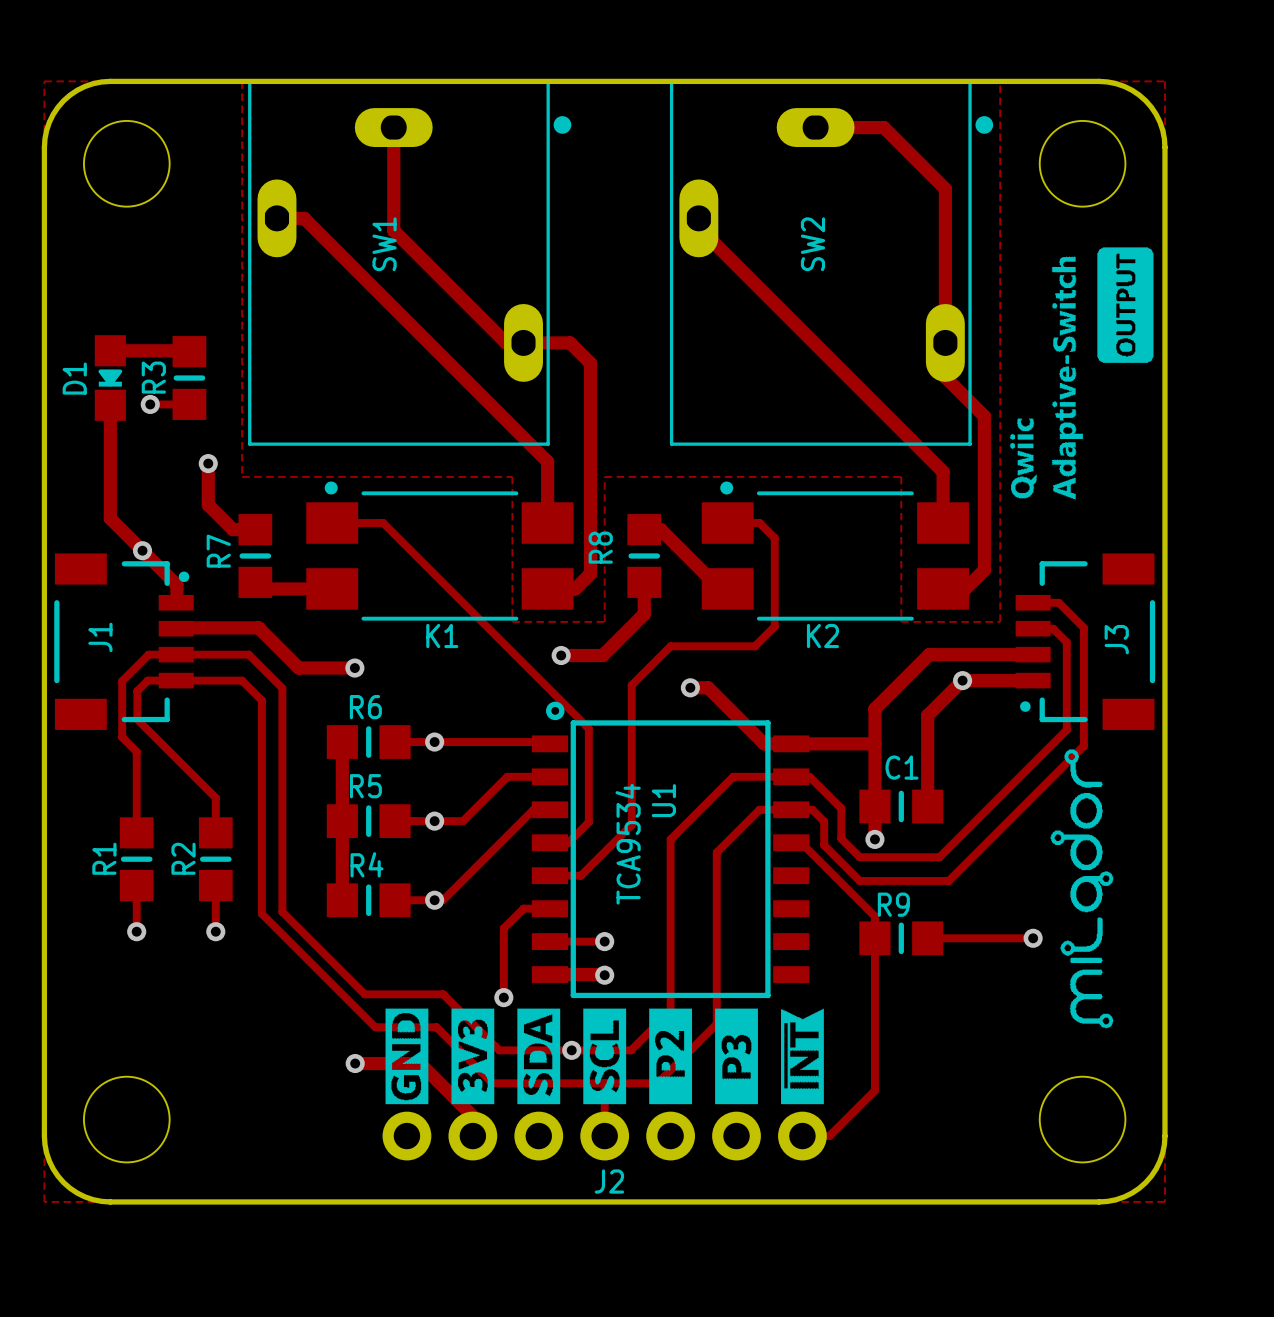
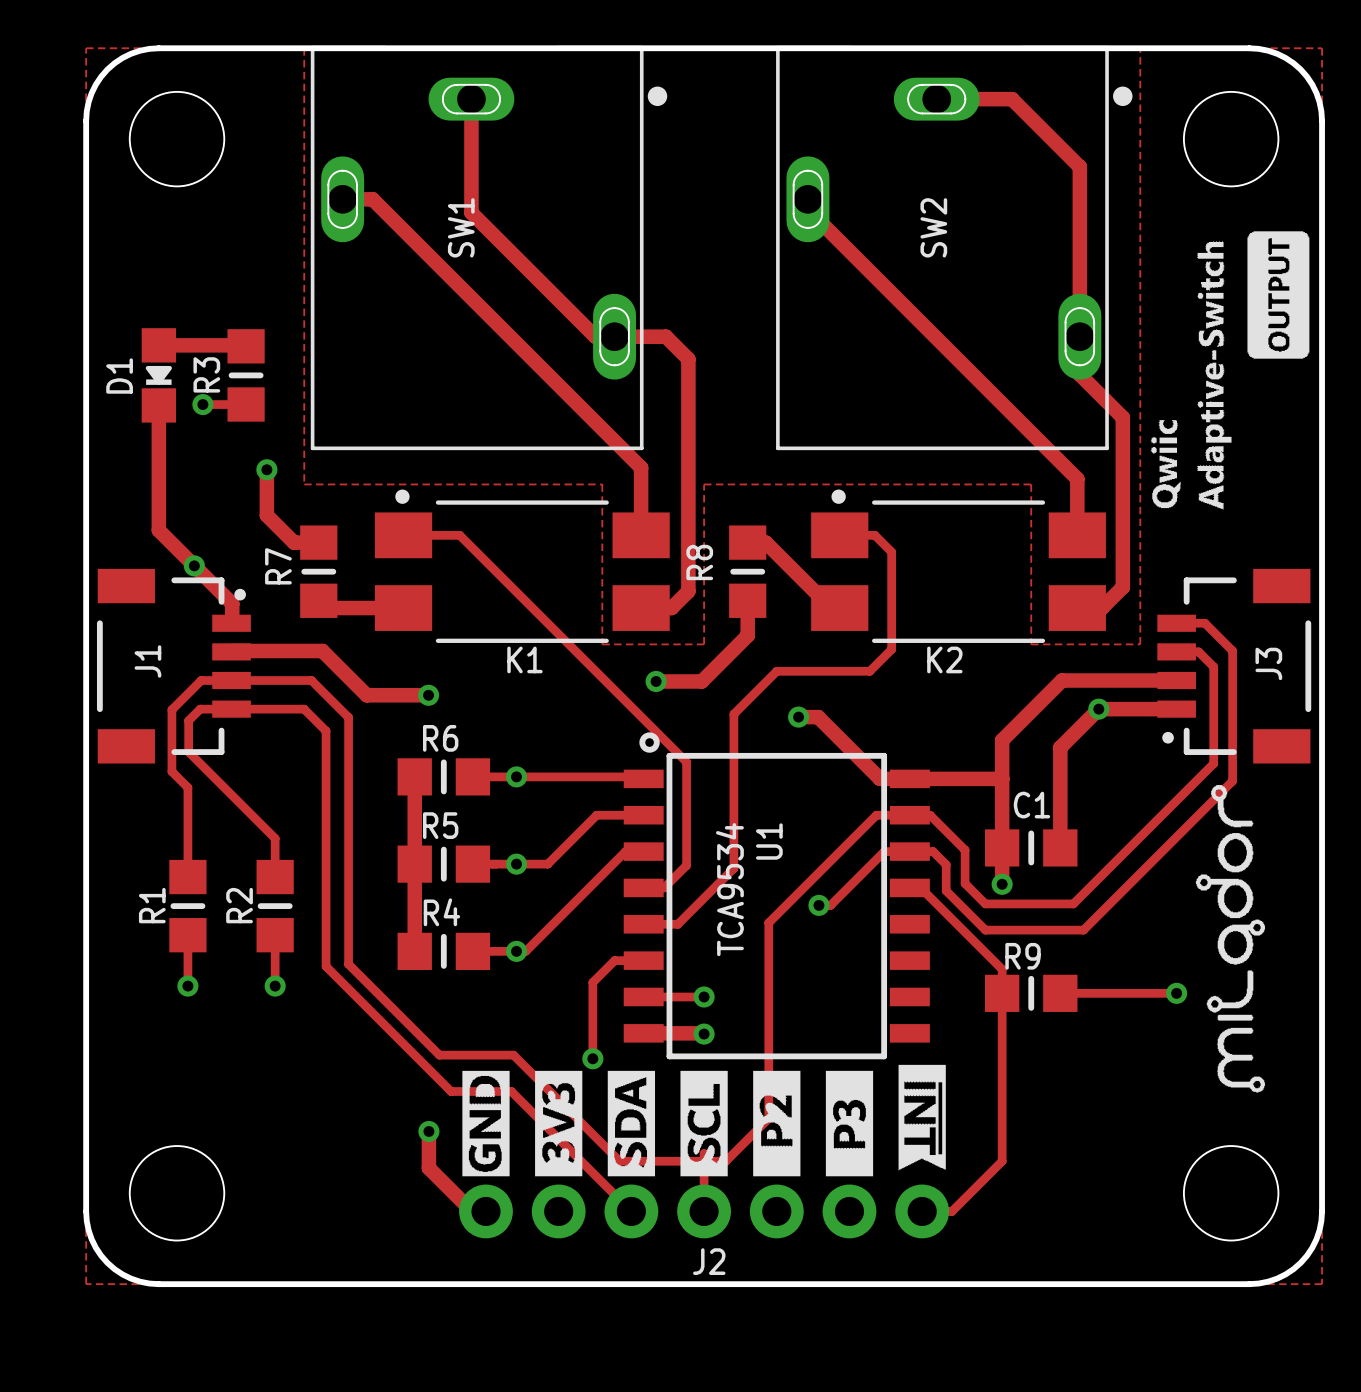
track: (760, 776) (733, 776) (670, 839) (670, 1010) (631, 1050) (499, 1050) (443, 994) (431, 994) -> (876, 815) (768, 922) (768, 1118) (725, 1161) (619, 1161) (513, 1055)
track: (768, 809) (759, 809) (716, 852) (716, 1023) (657, 1083) (492, 1083) (436, 1027) (430, 1027) -> (884, 851) (830, 905) (818, 905)
via: none -> (818, 905)
drawing shape: [781, 1008, 824, 1105] -> [898, 1064, 946, 1171]
track: none -> (511, 1091) (631, 1211)
via: (571, 1050) -> none
track: (355, 1063) (420, 1063) (472, 1116) (472, 1136) -> (428, 1131) (428, 1168) (472, 1211) (485, 1211)

